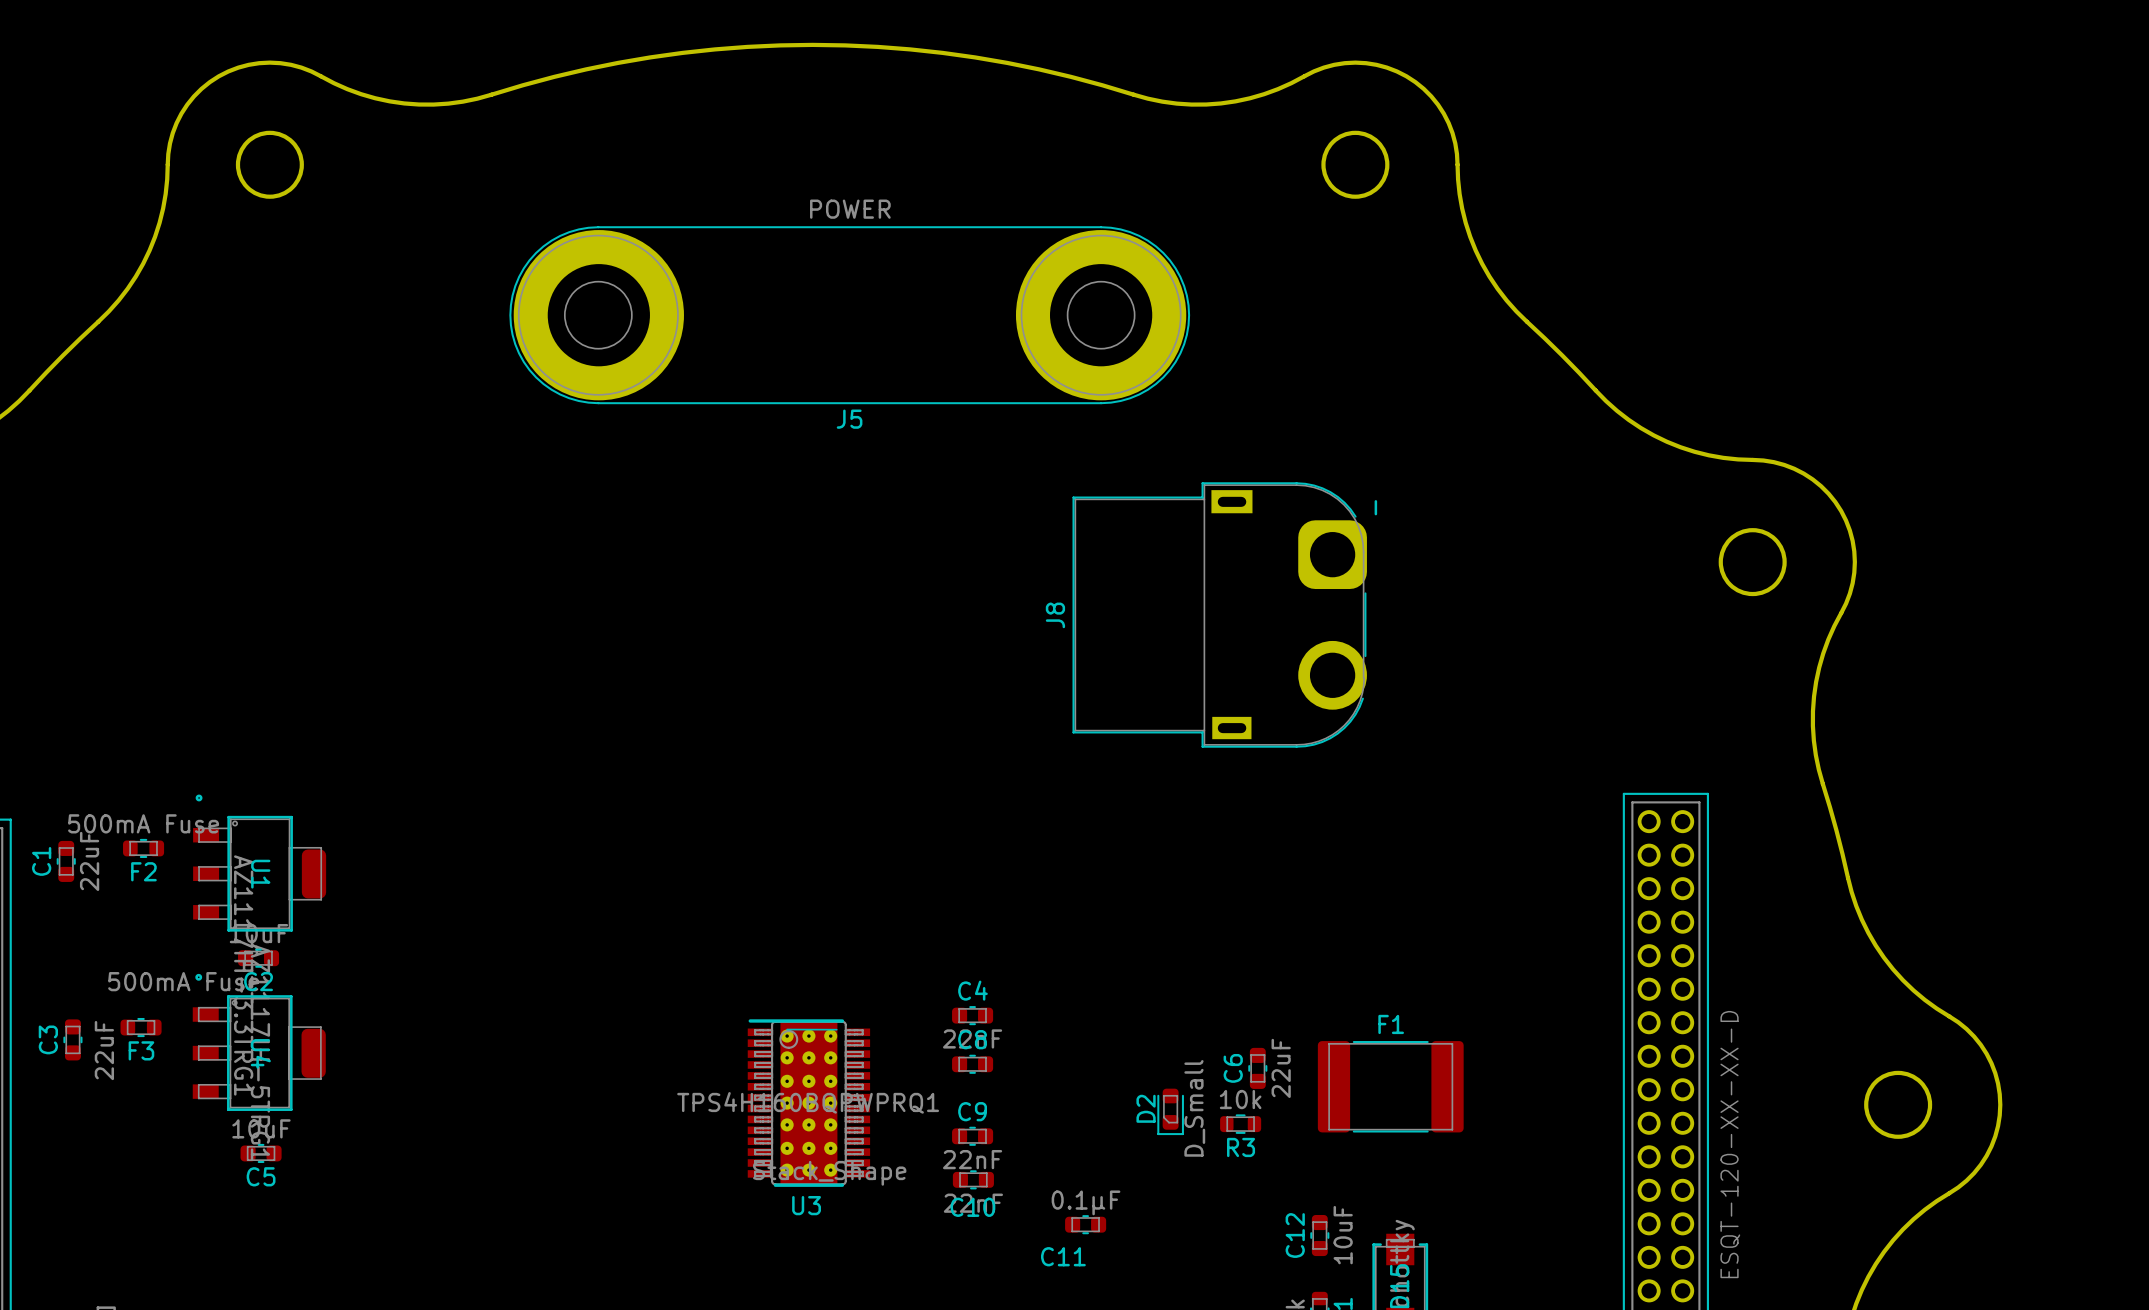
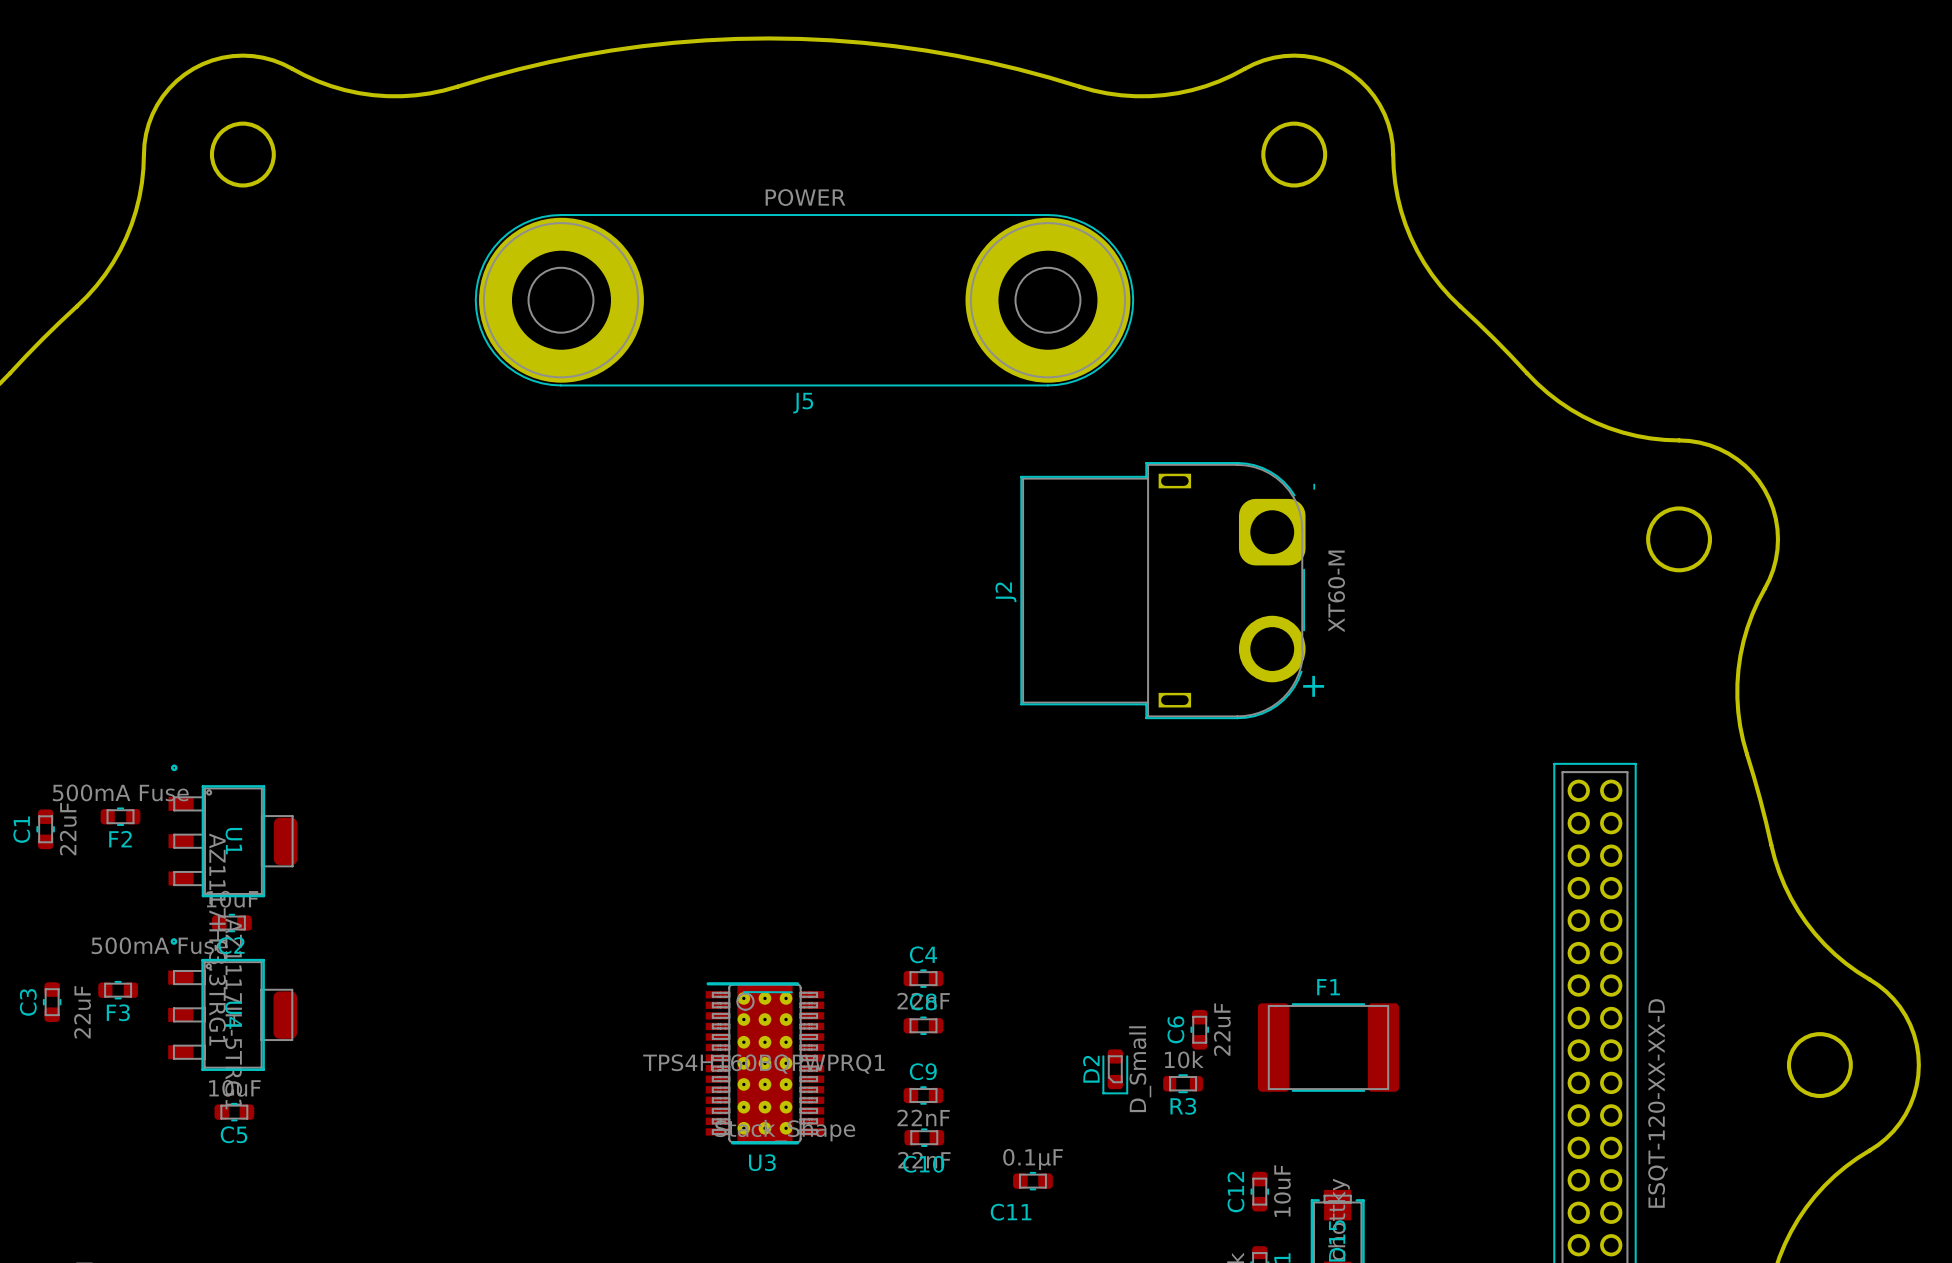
J8: (1219, 614) -> none
J2: none -> XT60-M (1162, 590)

